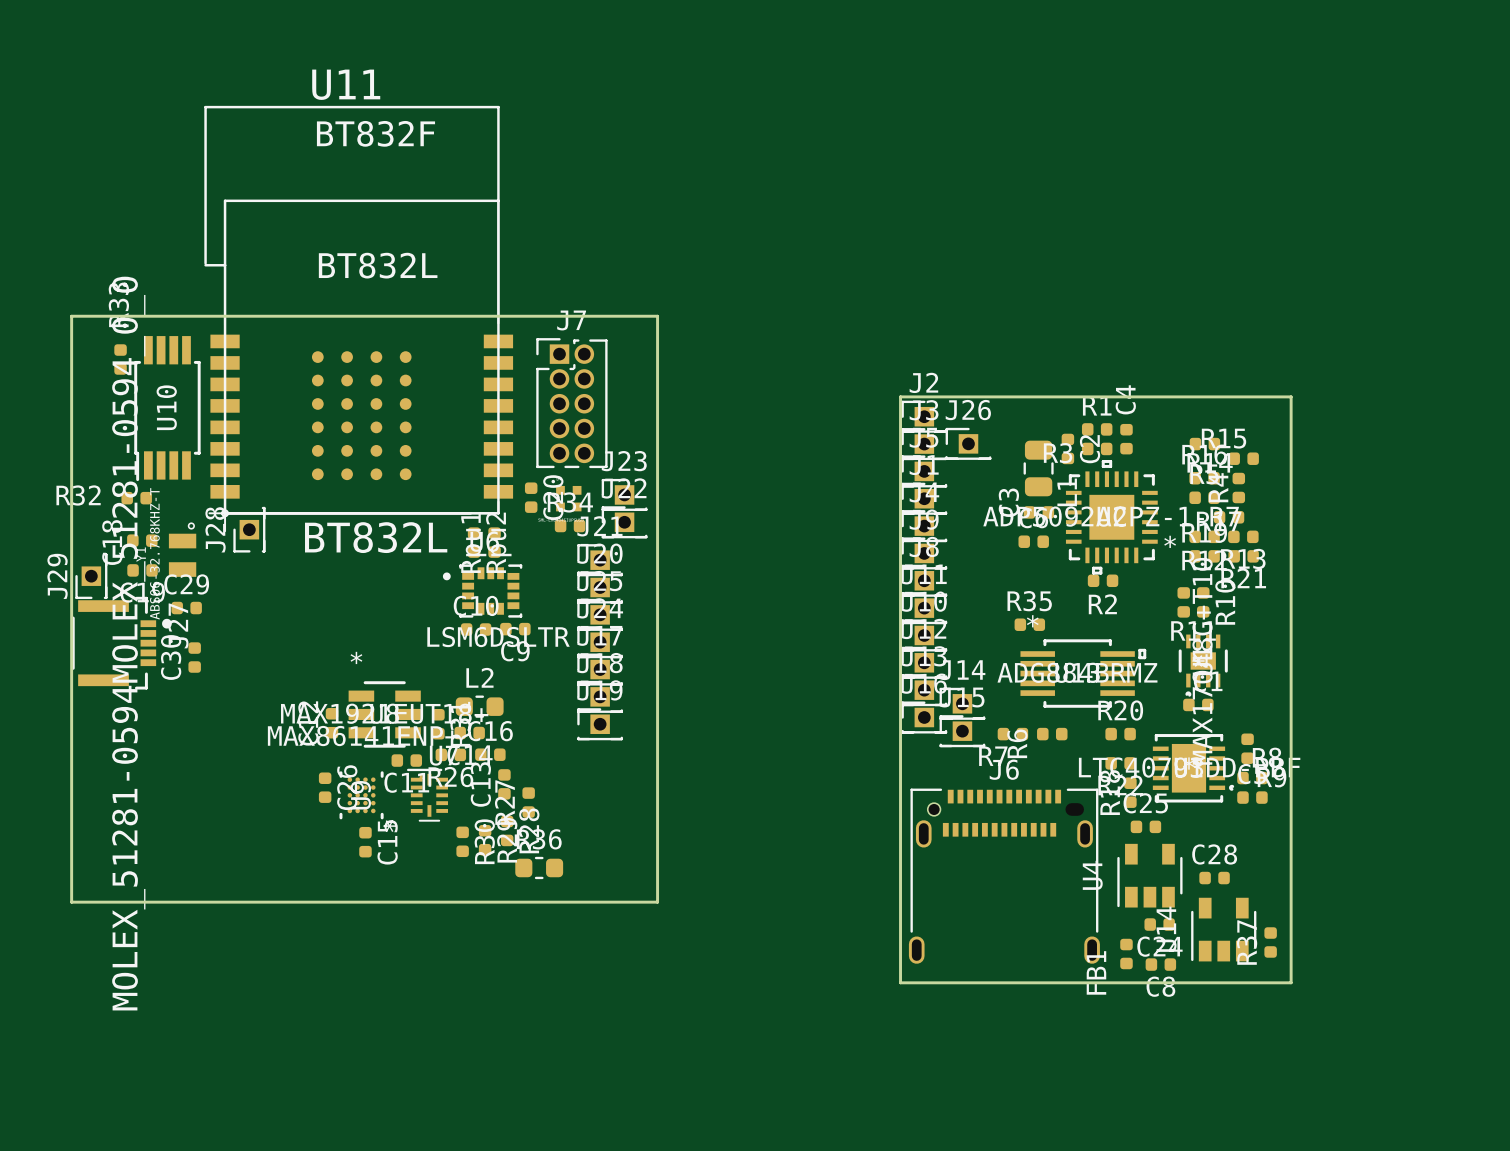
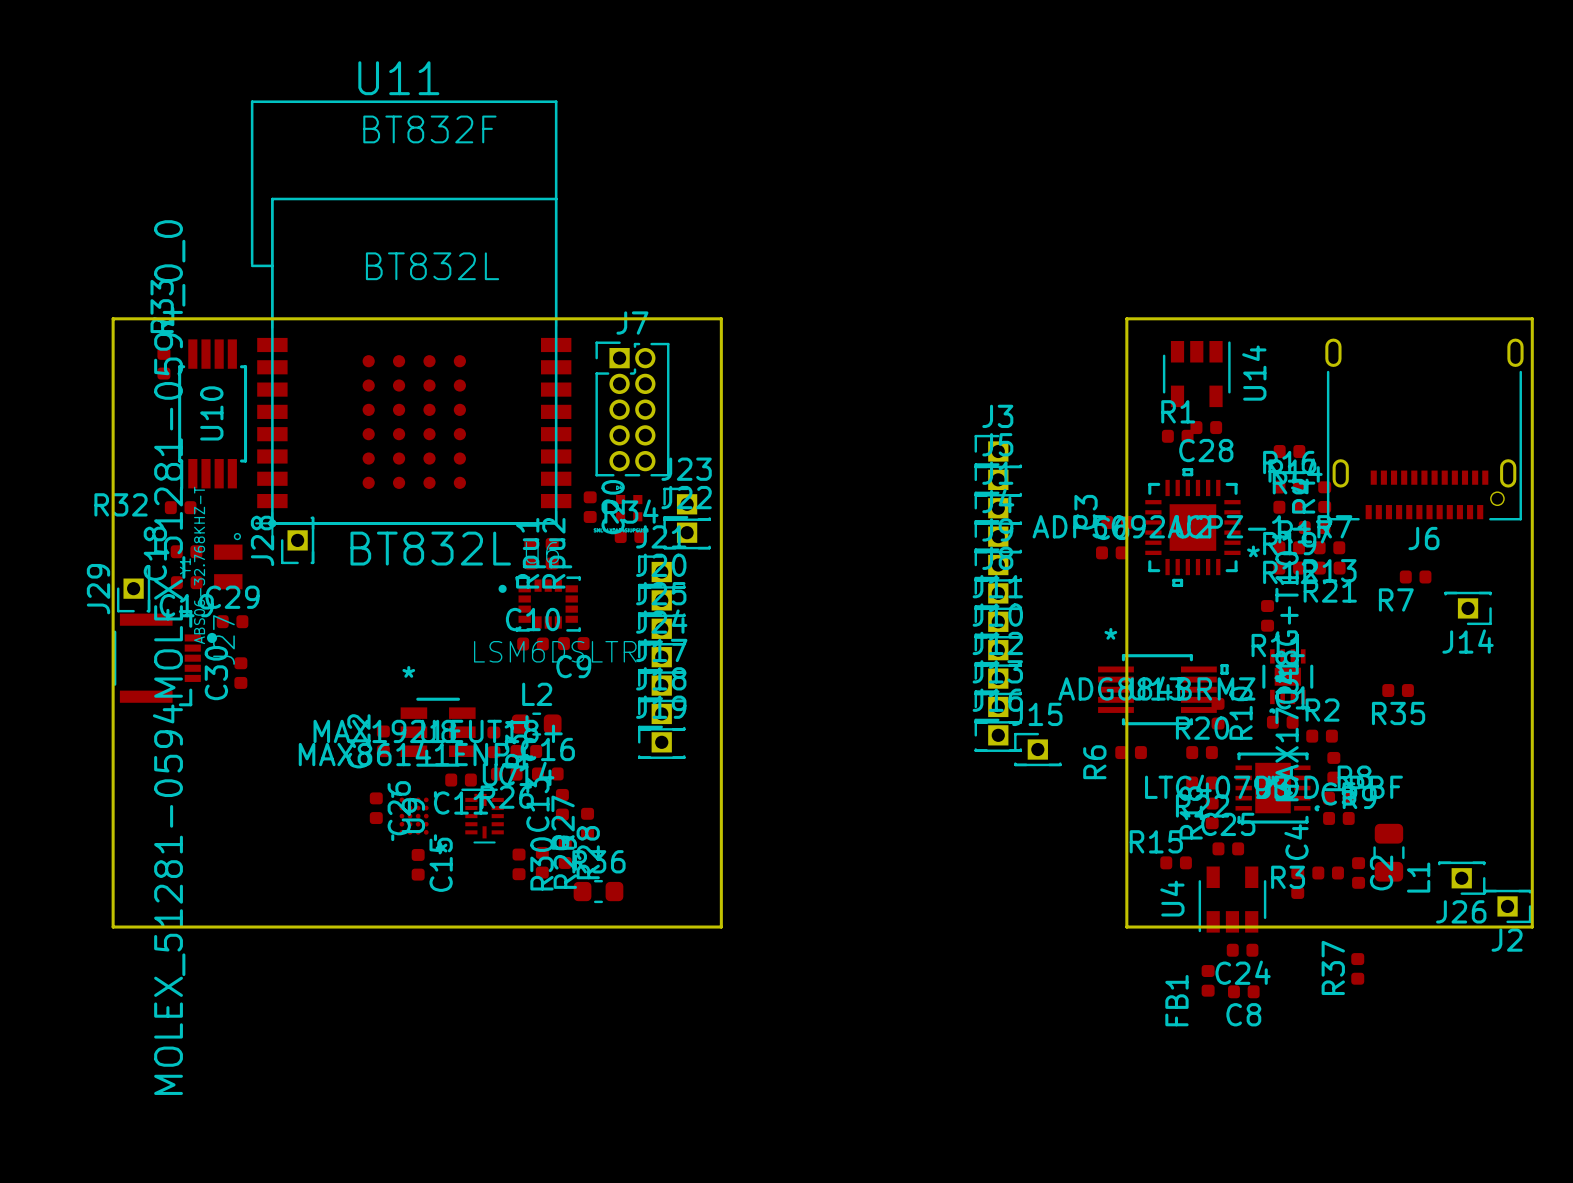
board edge: (900, 396) (1291, 396) (1291, 982) (900, 982) (900, 396) -> (1126, 318) (1532, 318) (1532, 927) (1126, 927) (1126, 318)
J2 rotation: 0° (924, 416) -> 180° (1507, 906)
J2 position: (924, 416) -> (1507, 906)
C4 position: (1126, 439) -> (1297, 883)
J26 rotation: 0° (968, 443) -> 180° (1461, 878)
J26 position: (968, 443) -> (1461, 878)
C2 position: (1067, 448) -> (1358, 872)
R3 position: (1097, 448) -> (1328, 872)
R15 position: (1243, 458) -> (1176, 862)
L1 position: (1038, 468) -> (1388, 852)
R2 position: (1103, 580) -> (1322, 736)
R35 name position: R35 (1029, 601) -> R35 (1398, 713)
R10 position: (1203, 602) -> (1218, 713)
R2 name position: R2 (1102, 604) -> R2 (1322, 710)
R35 position: (1029, 624) -> (1398, 690)
J14 rotation: 0° (962, 703) -> 180° (1468, 608)
J14 position: (962, 703) -> (1468, 608)
R7 position: (1012, 734) -> (1415, 576)
C28 name position: C28 (1214, 854) -> C28 (1206, 450)
J6 rotation: 0° (1004, 876) -> 180° (1424, 429)
J6 position: (1004, 876) -> (1424, 429)
C28 position: (1214, 878) -> (1206, 427)
U14 rotation: 0° (1223, 929) -> 180° (1196, 374)
U14 position: (1223, 929) -> (1196, 374)

